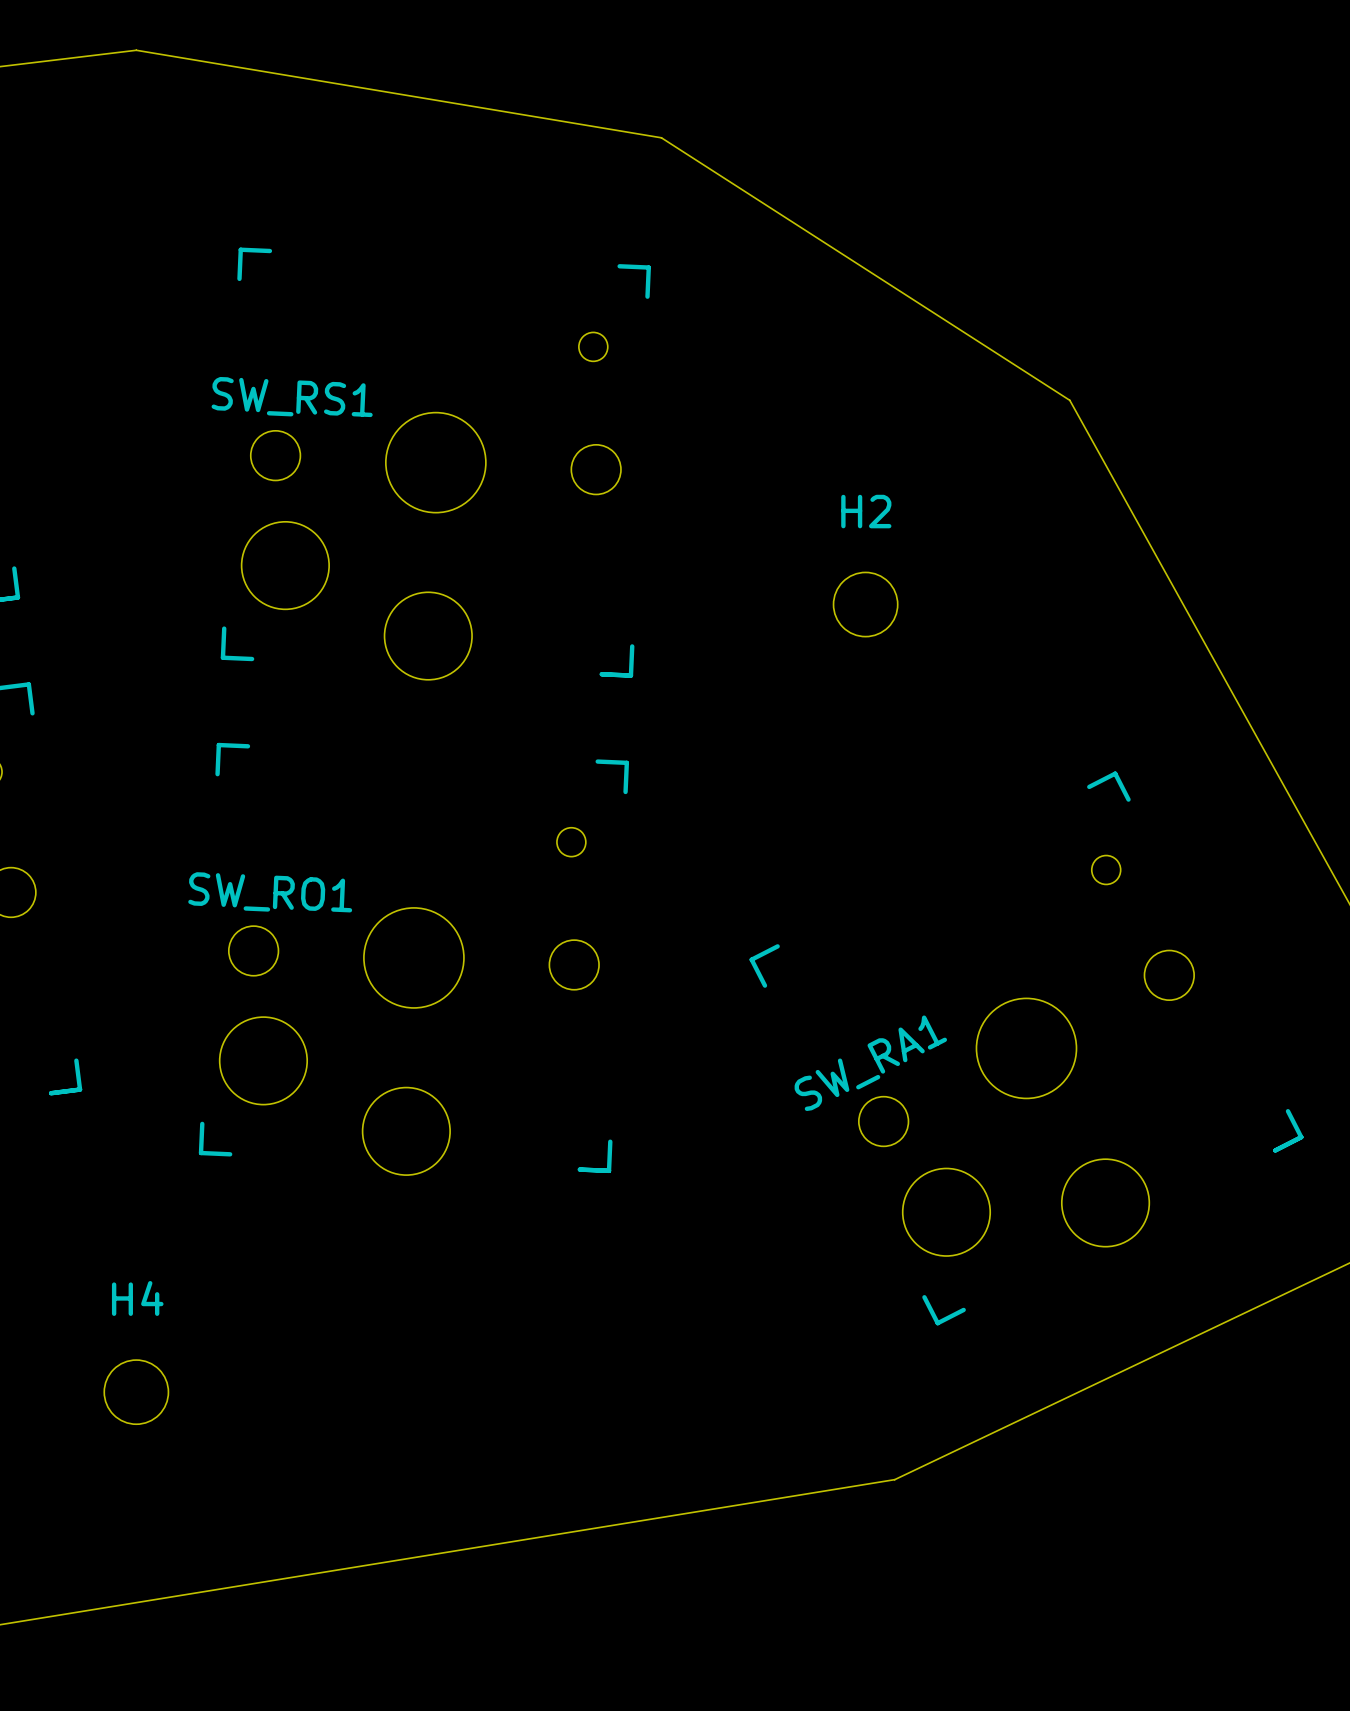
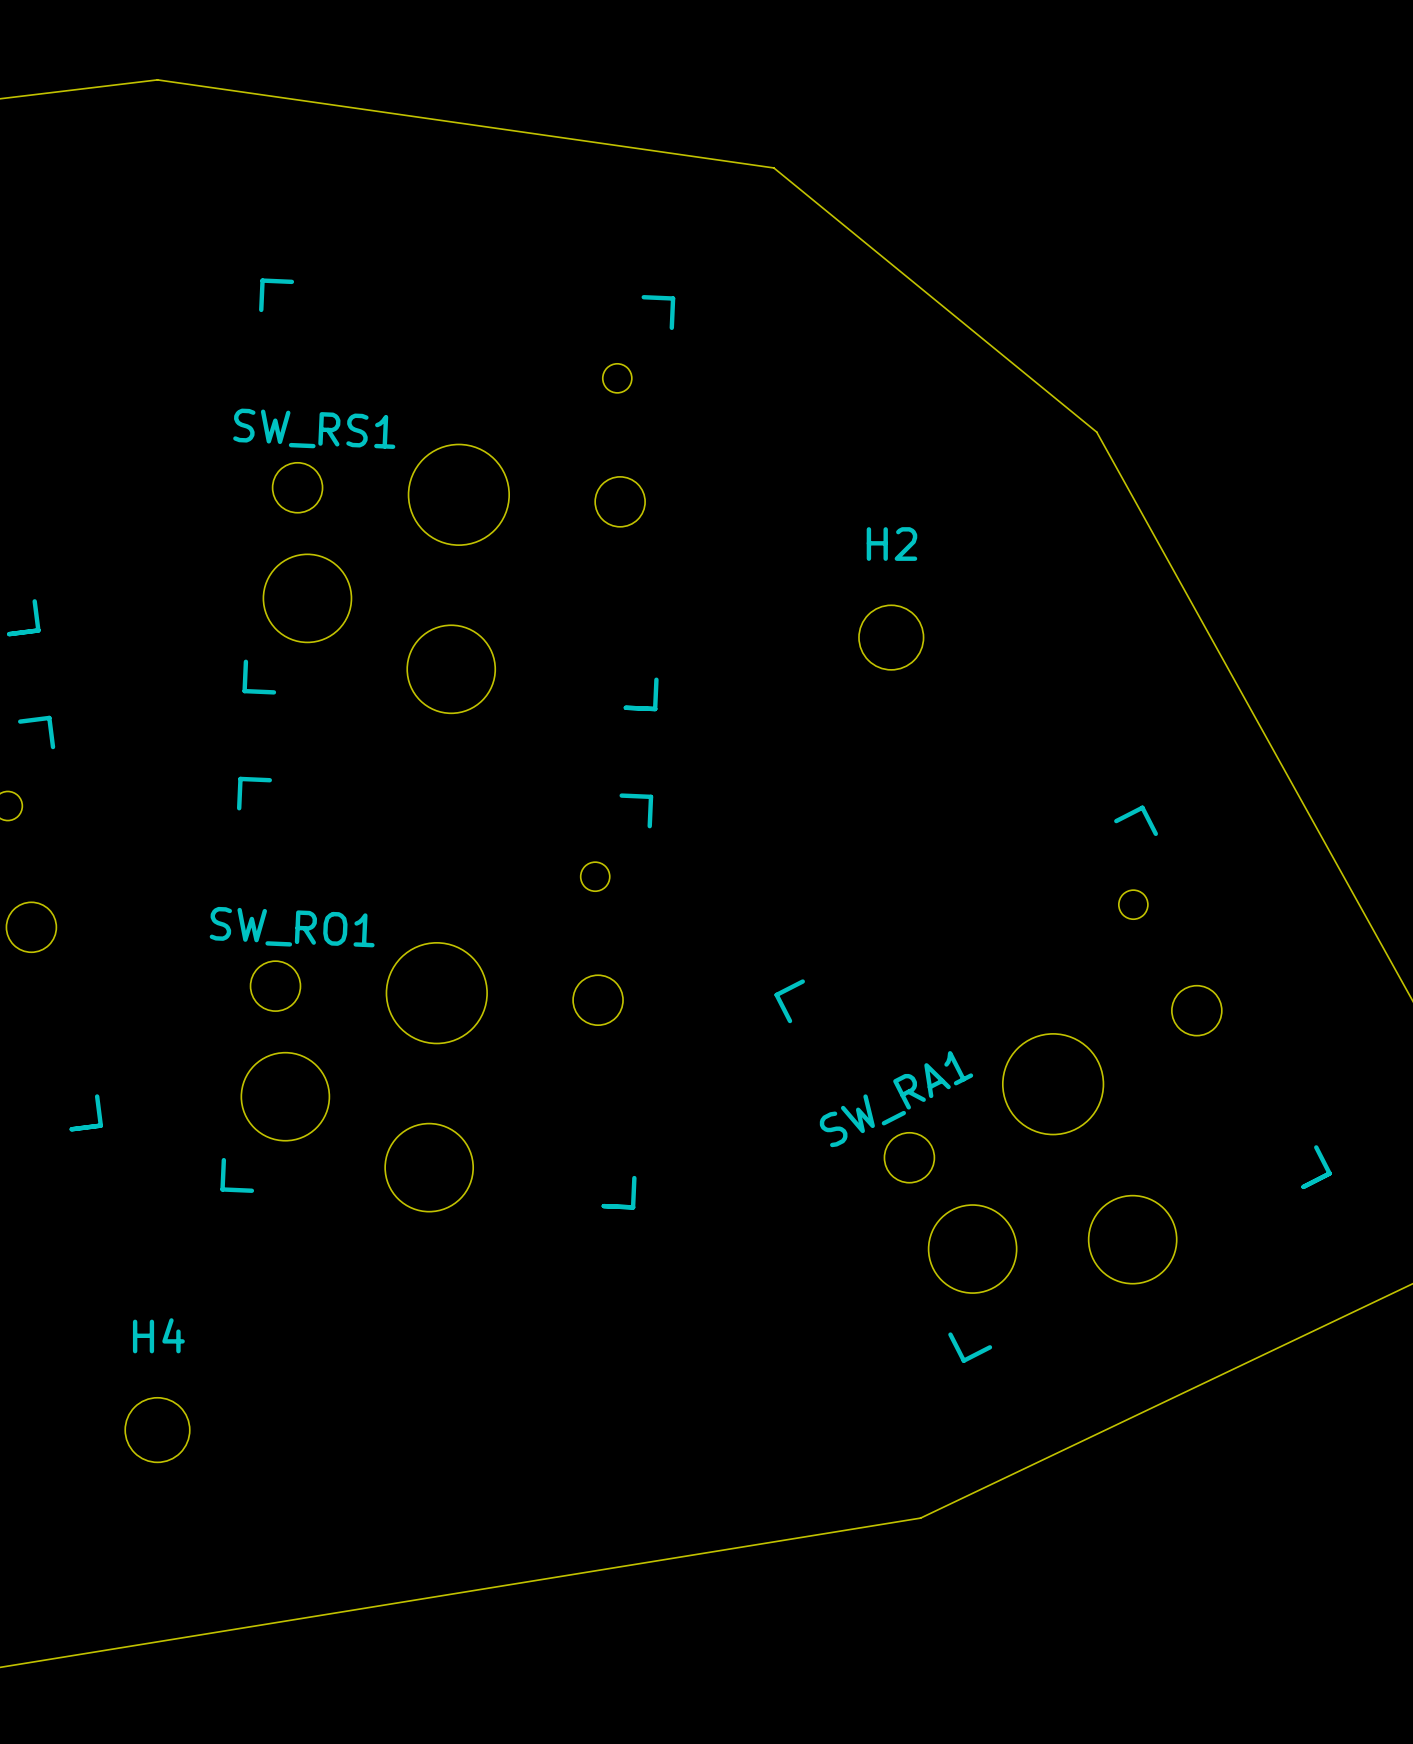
board edge: (136, 50) (661, 137) (1069, 400) -> (157, 79) (773, 167) (1096, 432)

